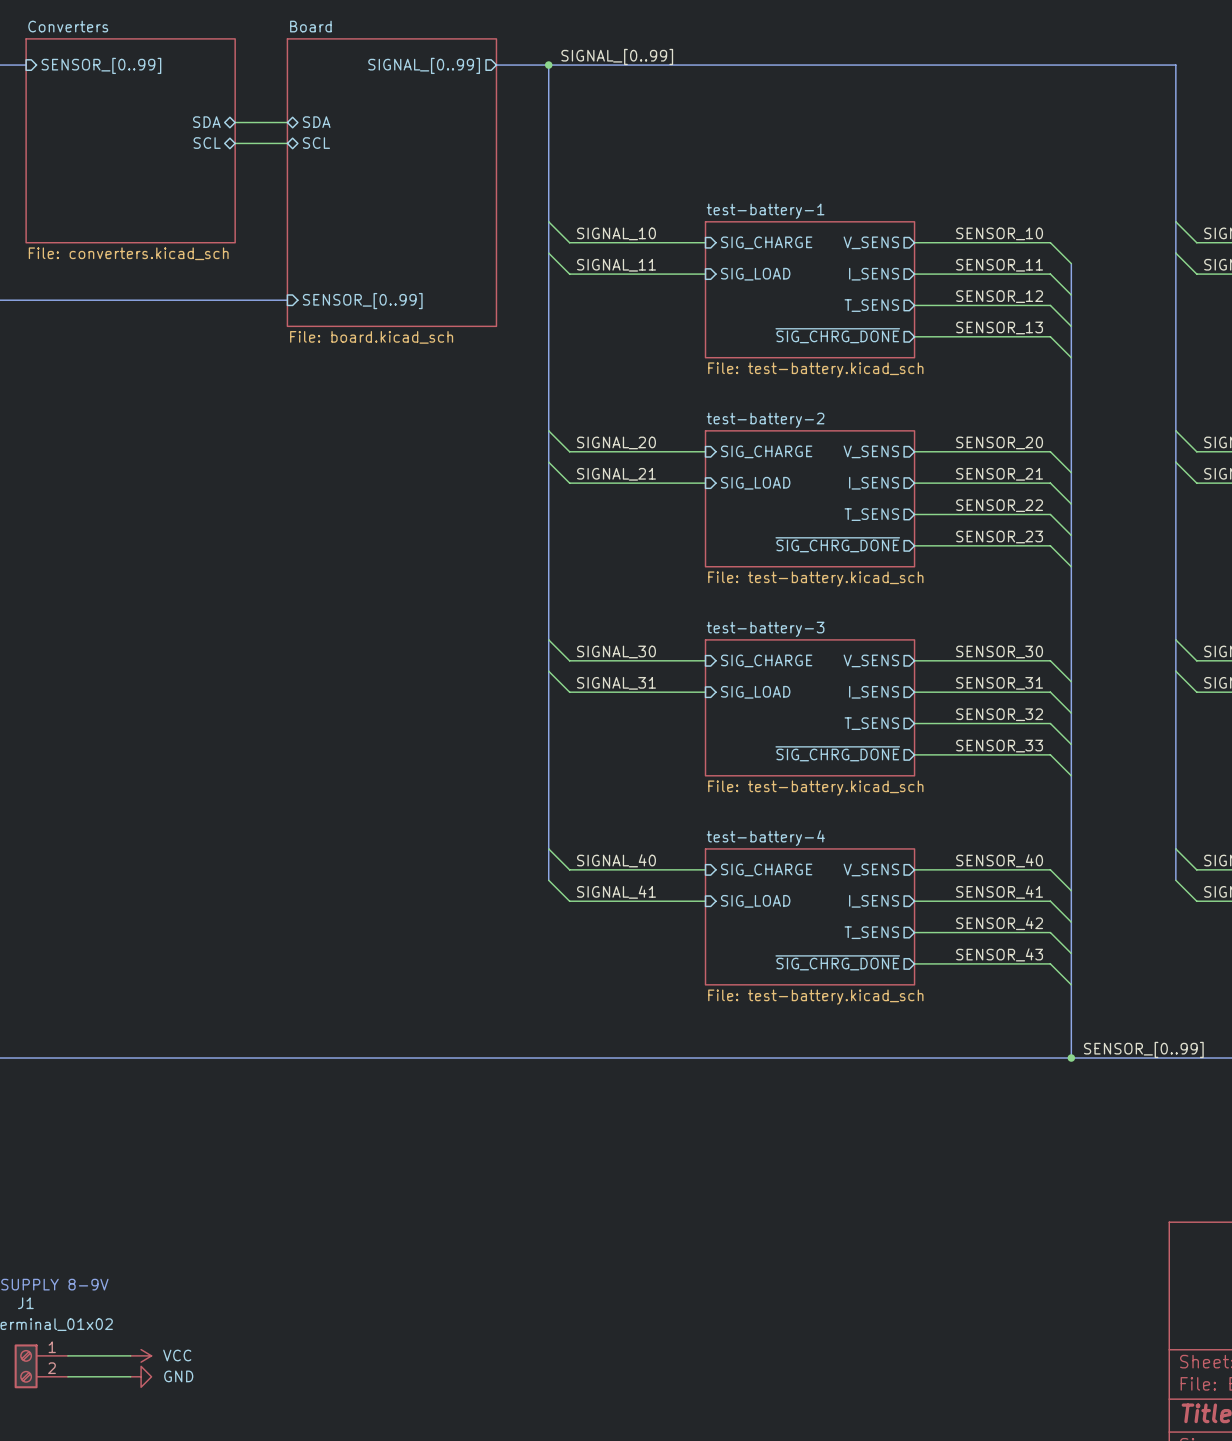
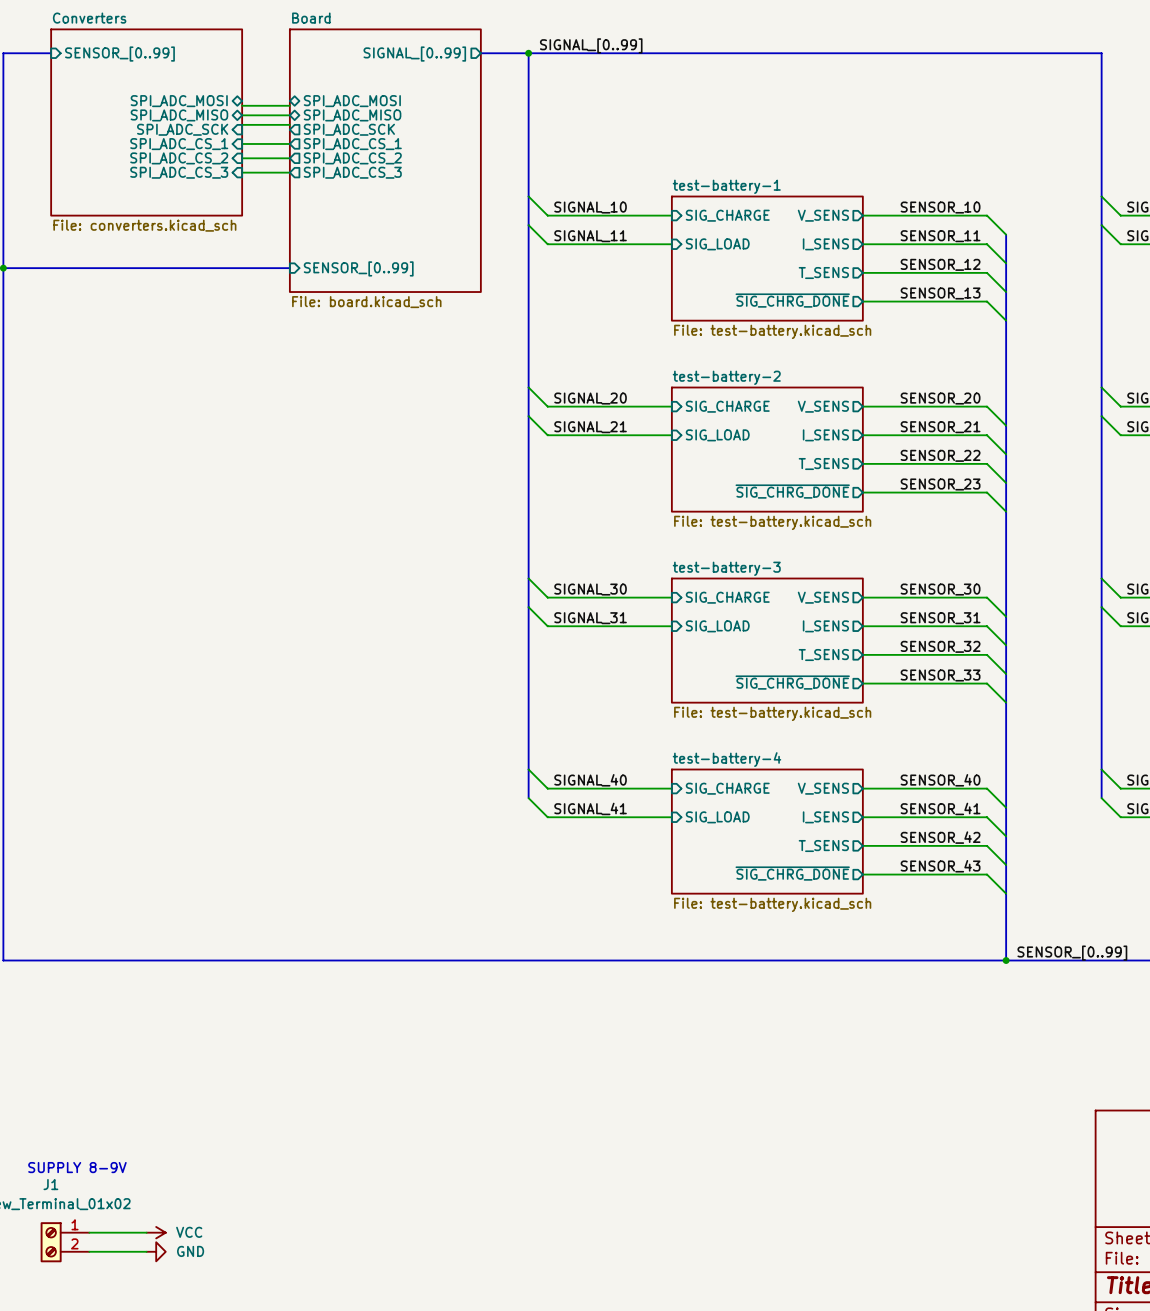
sheet pin: none -> SPI_ADC_MOSI (179, 101)
sheet pin: none -> SPI_ADC_MOSI (352, 101)
sheet pin: SDA (206, 122) -> none
sheet pin: SDA (316, 122) -> none
wire: none -> (242, 115) (289, 115)
sheet pin: none -> SPI_ADC_MISO (179, 115)
sheet pin: none -> SPI_ADC_MISO (352, 115)
sheet pin: SCL (207, 143) -> none
sheet pin: SCL (316, 143) -> none
sheet pin: none -> SPI_ADC_SCK (182, 129)
sheet pin: none -> SPI_ADC_SCK (349, 129)
sheet pin: none -> SPI_ADC_CS_1 (179, 144)
wire: none -> (242, 143) (289, 143)
sheet pin: none -> SPI_ADC_CS_1 (352, 144)
sheet pin: none -> SPI_ADC_CS_2 (179, 158)
wire: none -> (242, 158) (289, 158)
sheet pin: none -> SPI_ADC_CS_2 (352, 158)
sheet pin: none -> SPI_ADC_CS_3 (179, 172)
wire: none -> (242, 172) (289, 172)
sheet pin: none -> SPI_ADC_CS_3 (352, 172)

